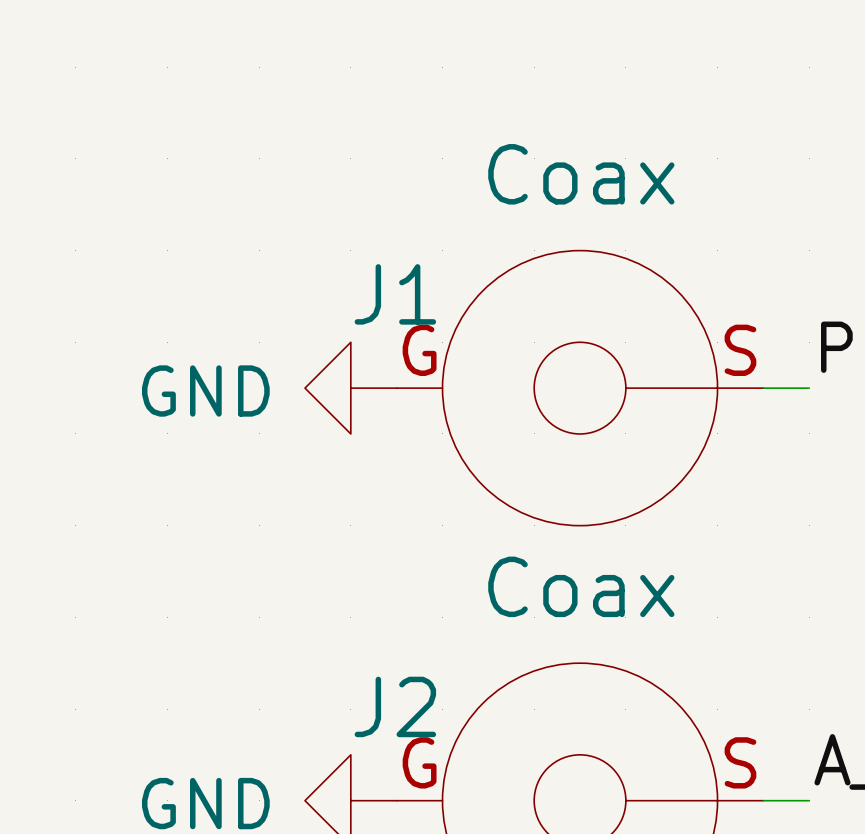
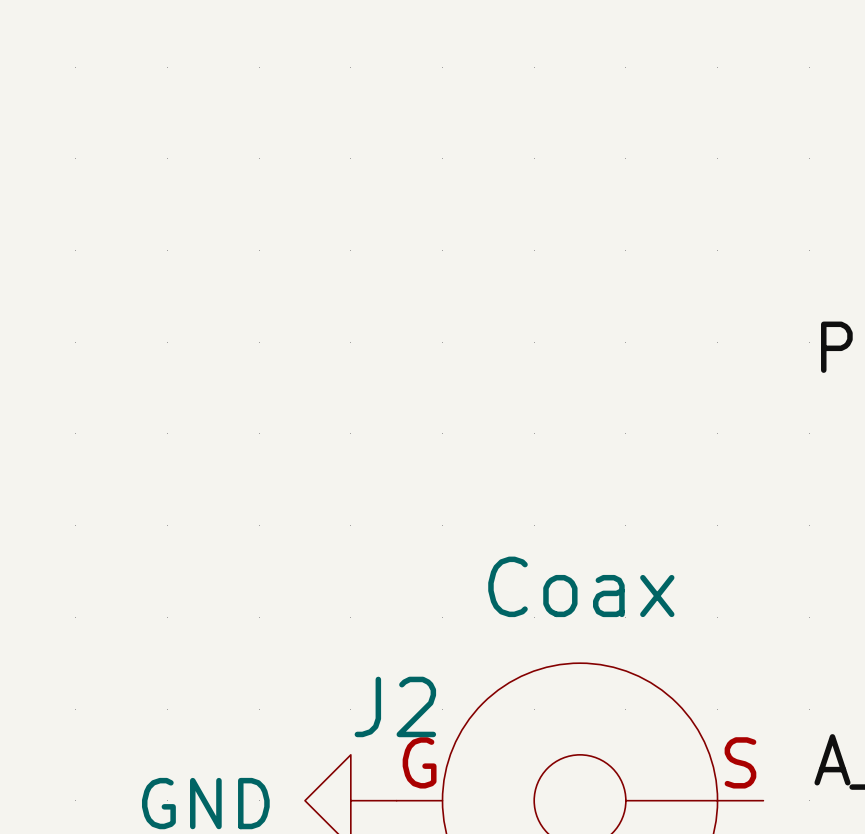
power symbol: GND (350, 388) -> none
J1: Coax (580, 388) -> none
wire: (763, 388) (809, 388) -> none
wire: (763, 800) (809, 800) -> none

